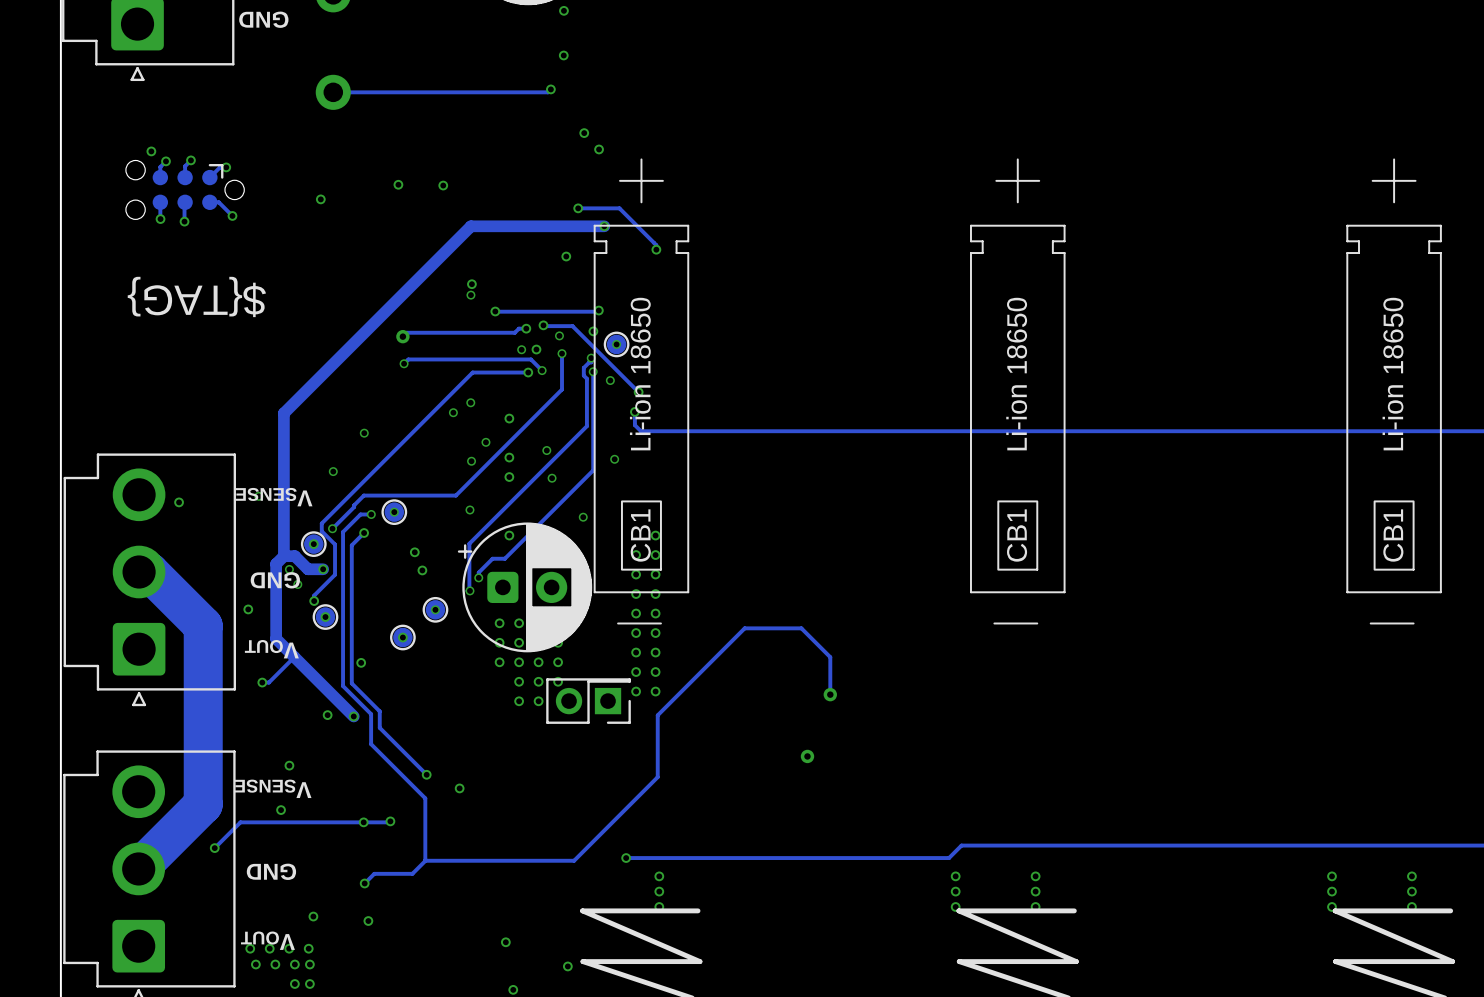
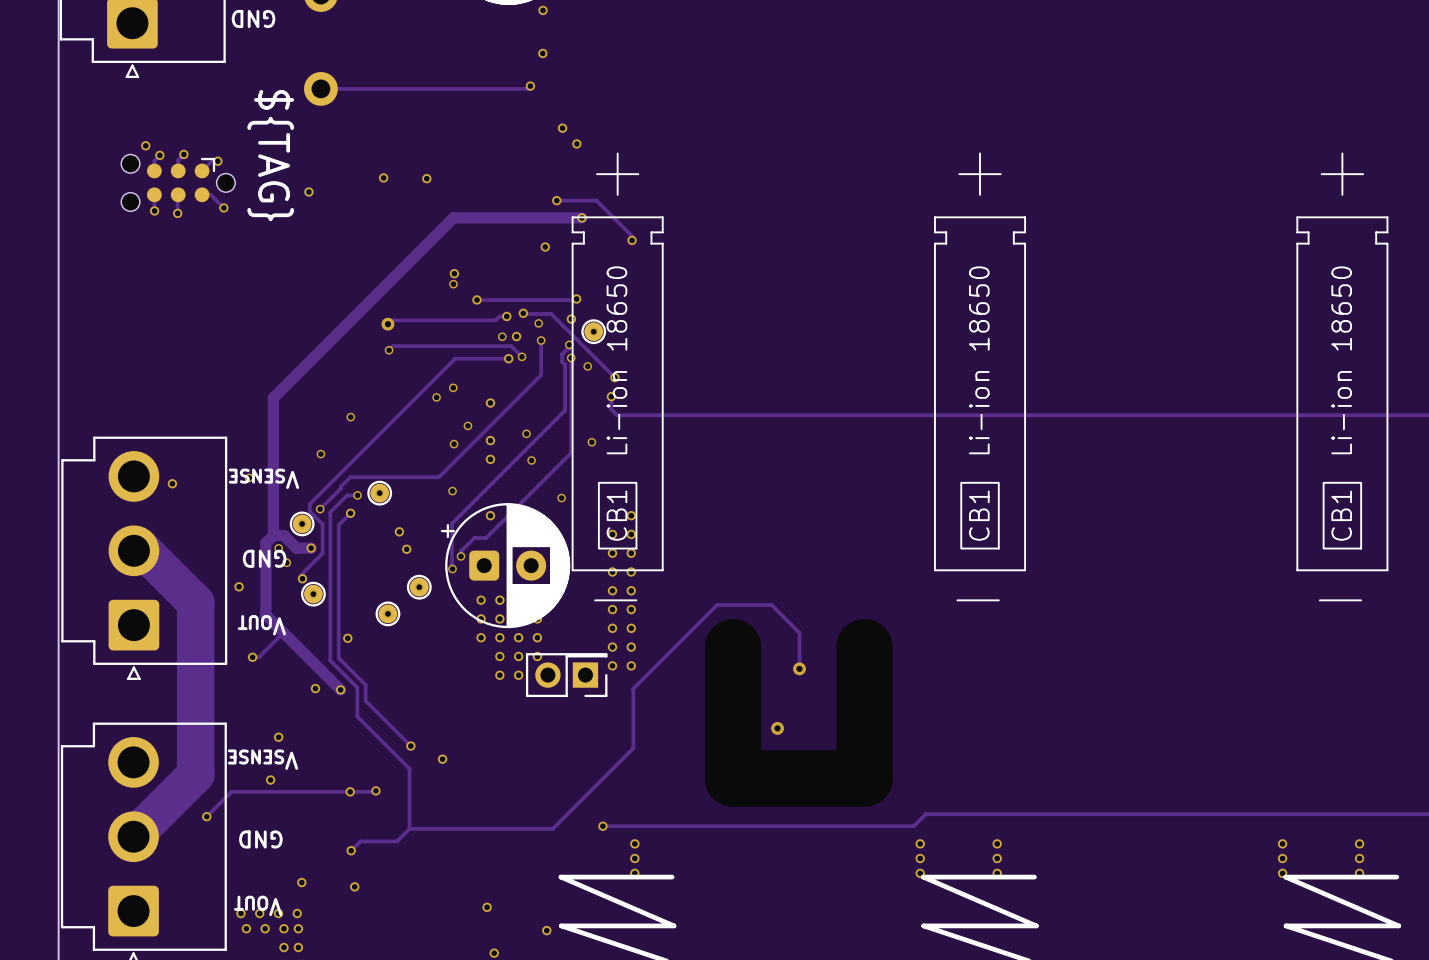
text rotation: 0° (196, 296) -> 90° counterclockwise (270, 155)

